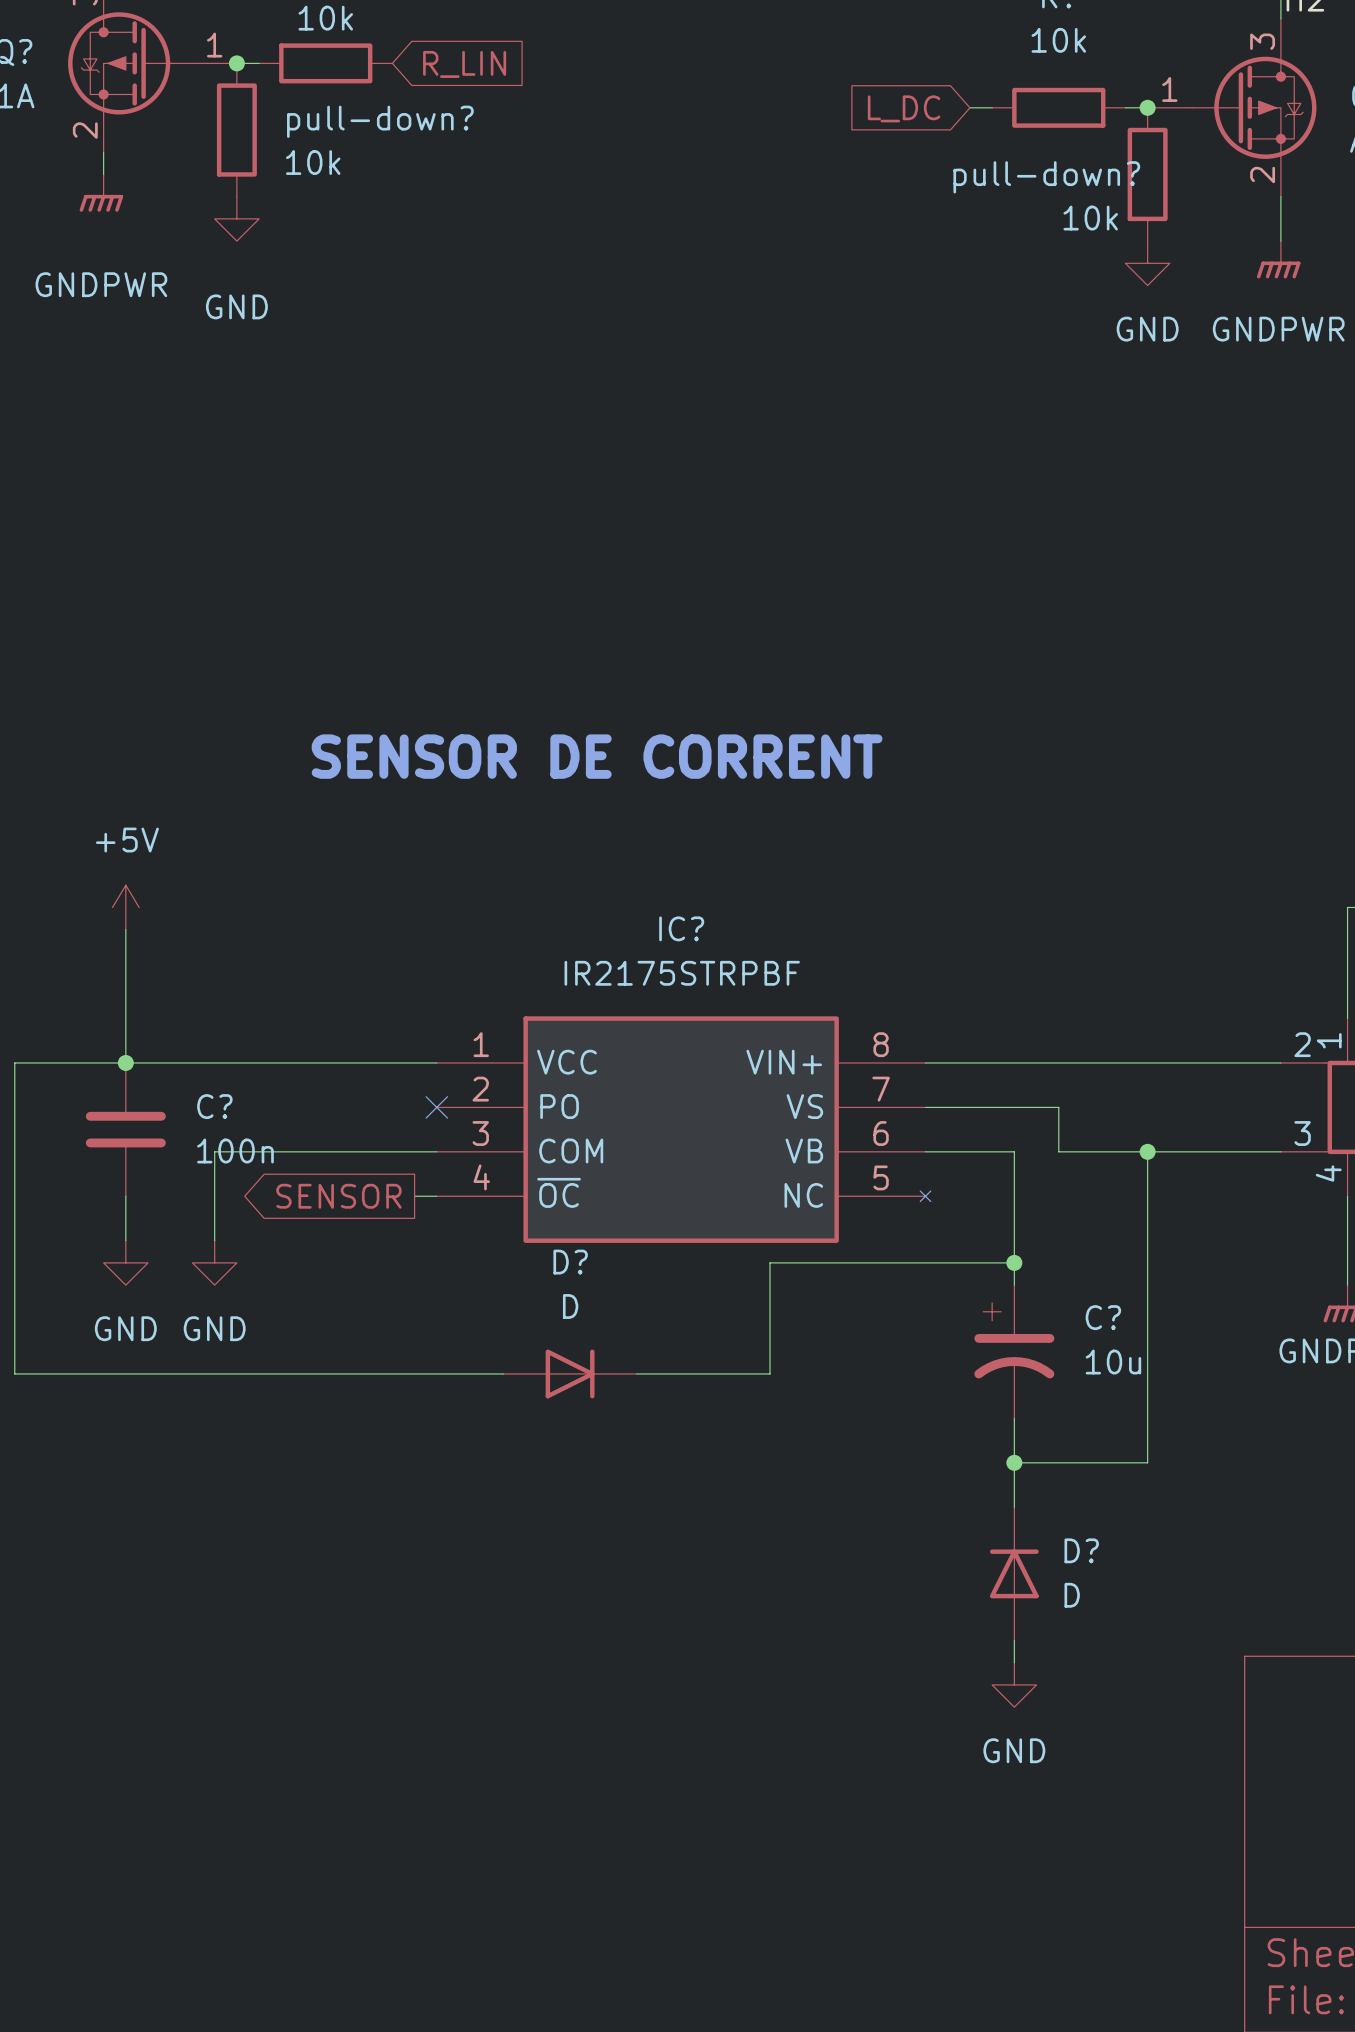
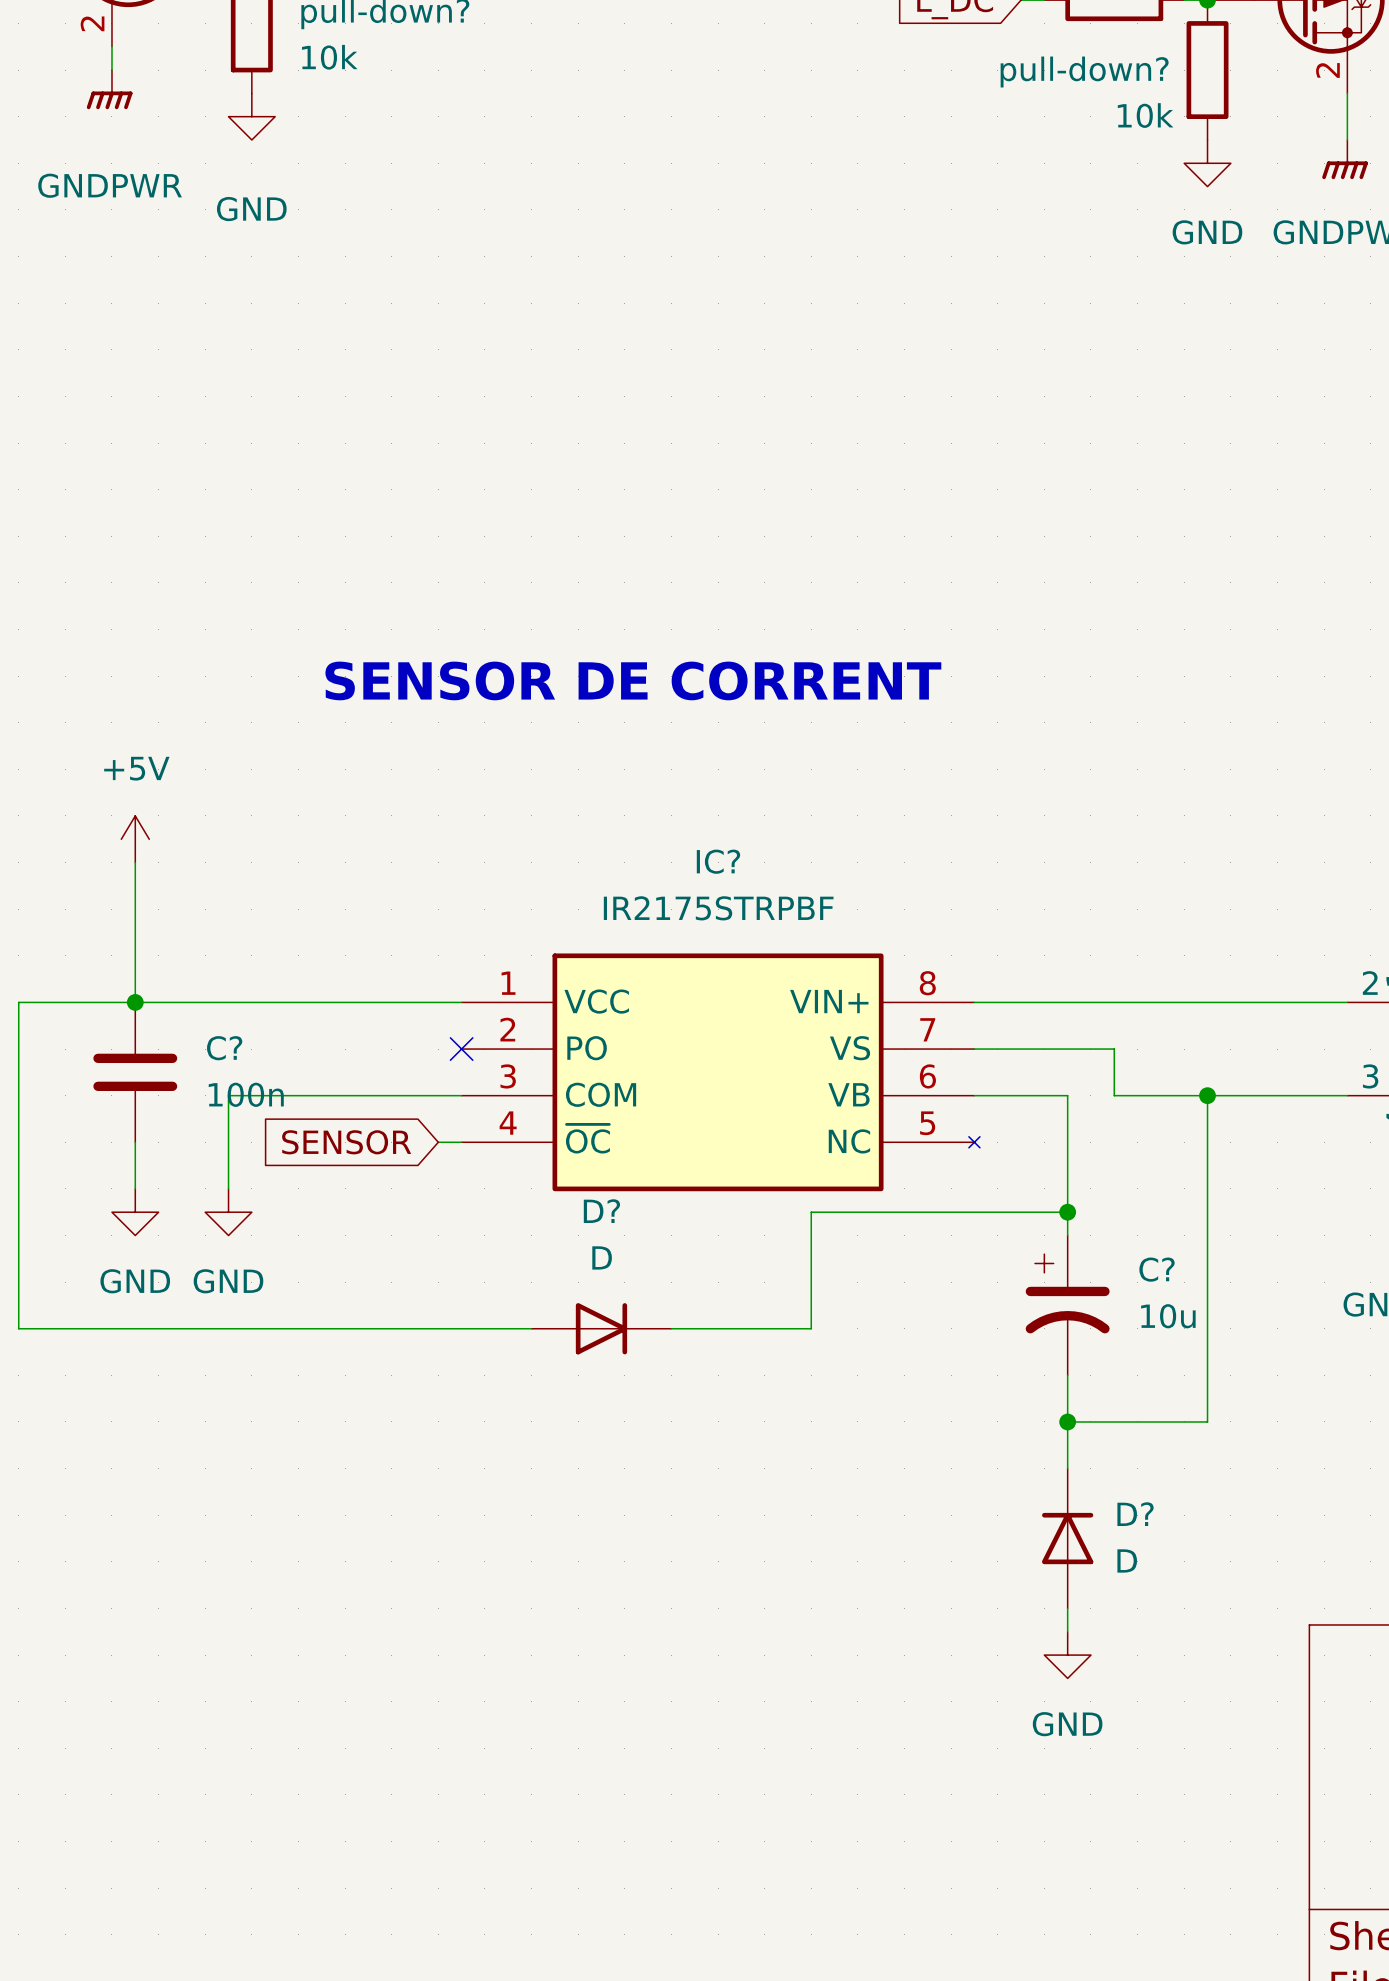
global label shape: output (338, 1196) -> input (346, 1142)

